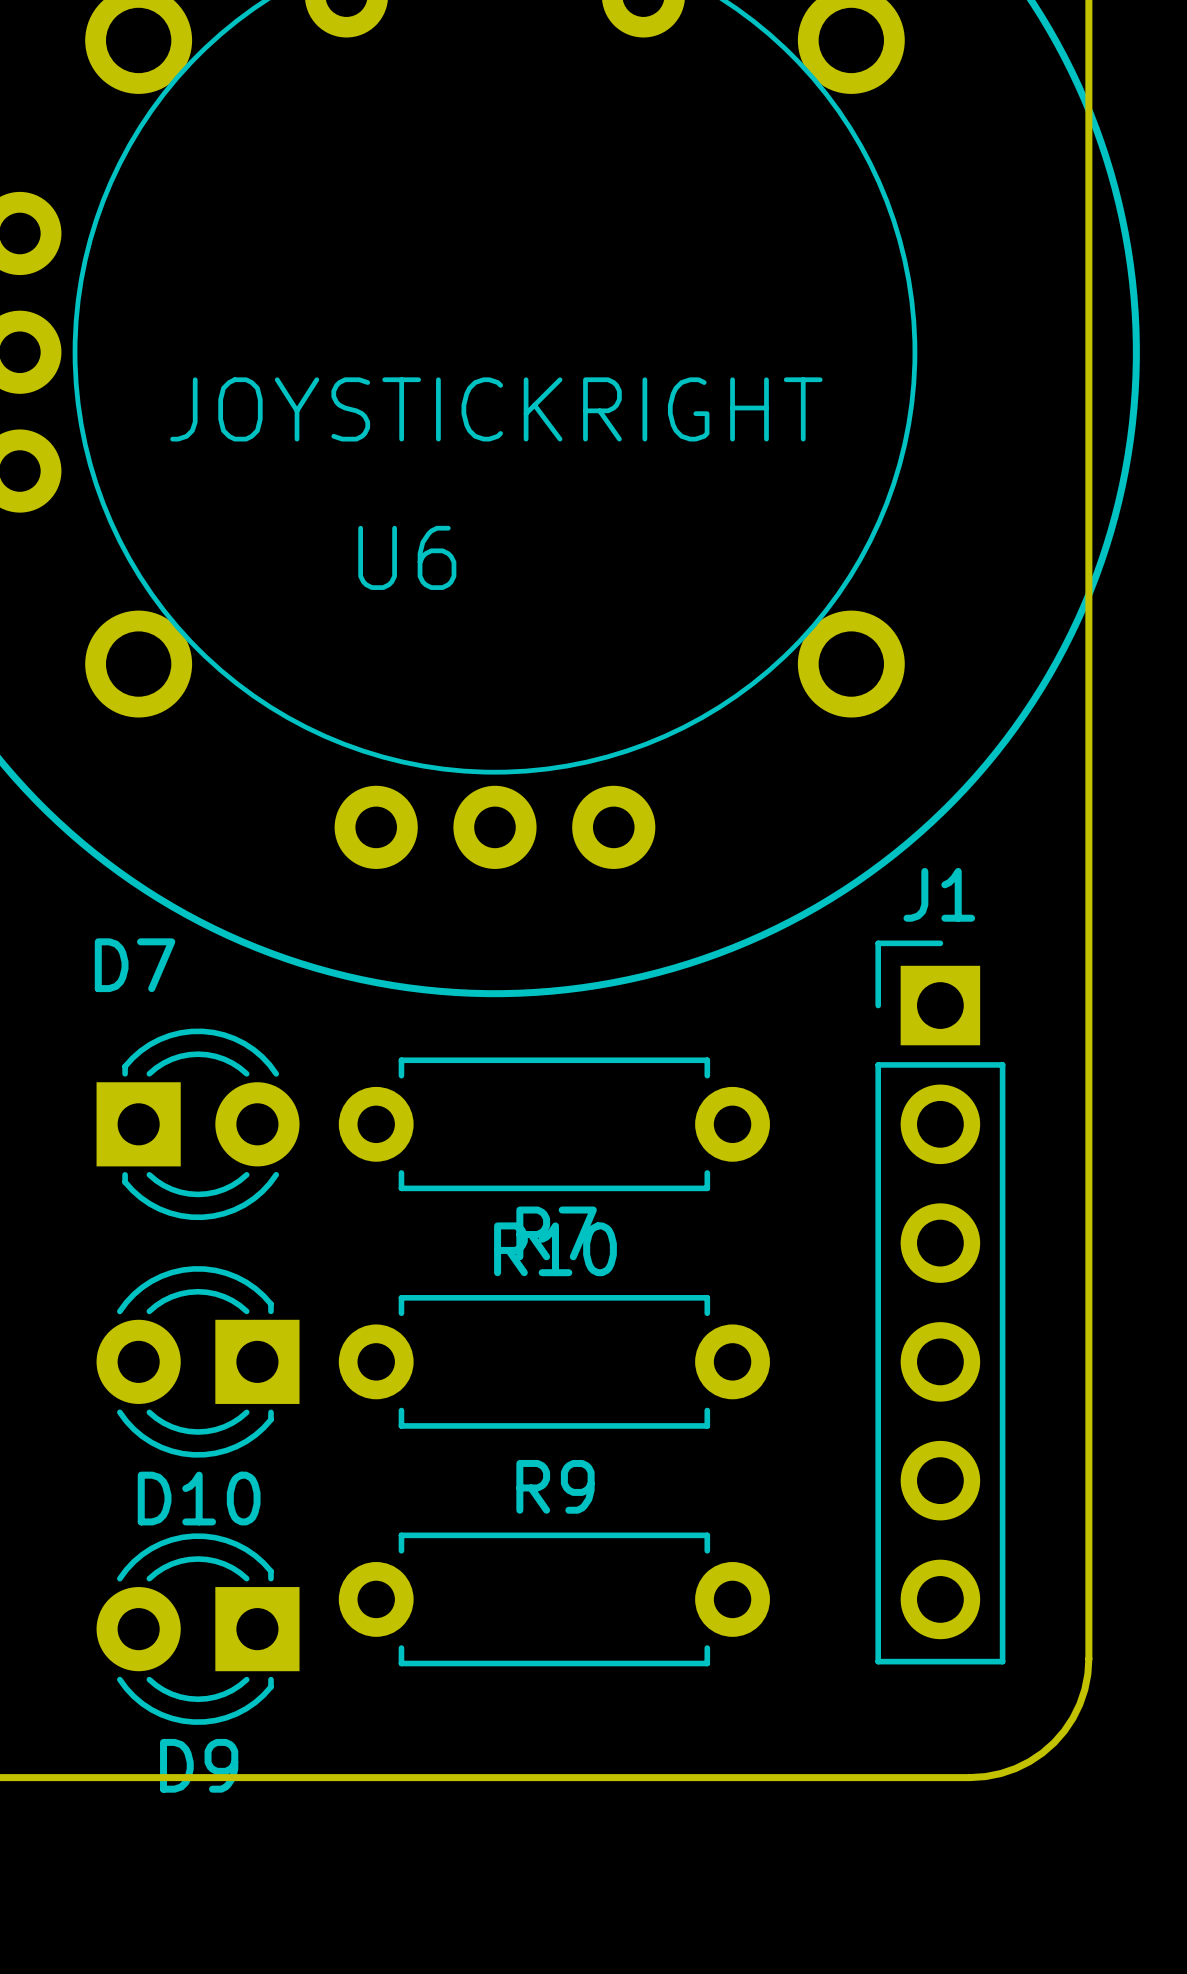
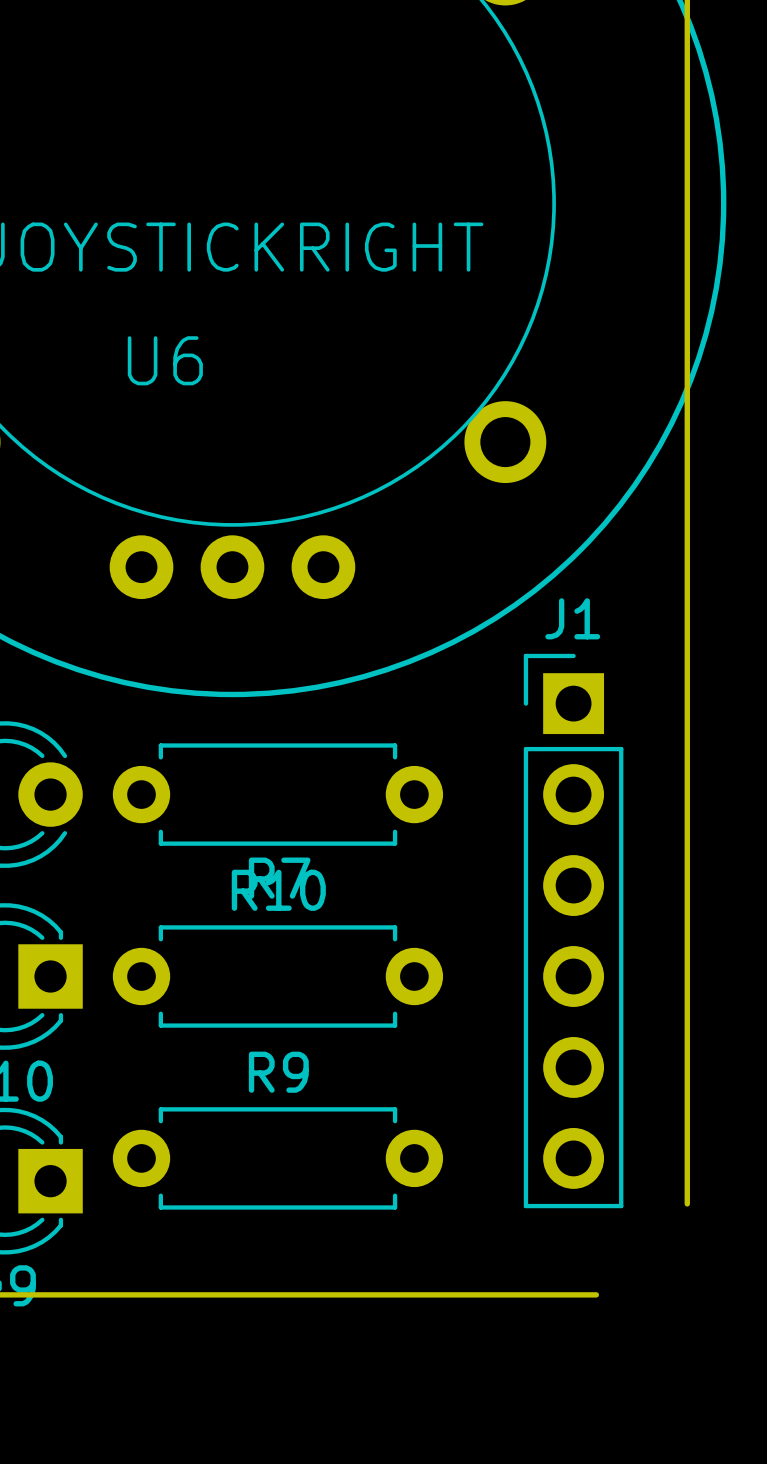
board edge: (1088, 1658) (1084, 1689) (1079, 1704) (1064, 1731) (1054, 1742) (1029, 1761) (1015, 1768) (1000, 1773) (970, 1777) -> none

